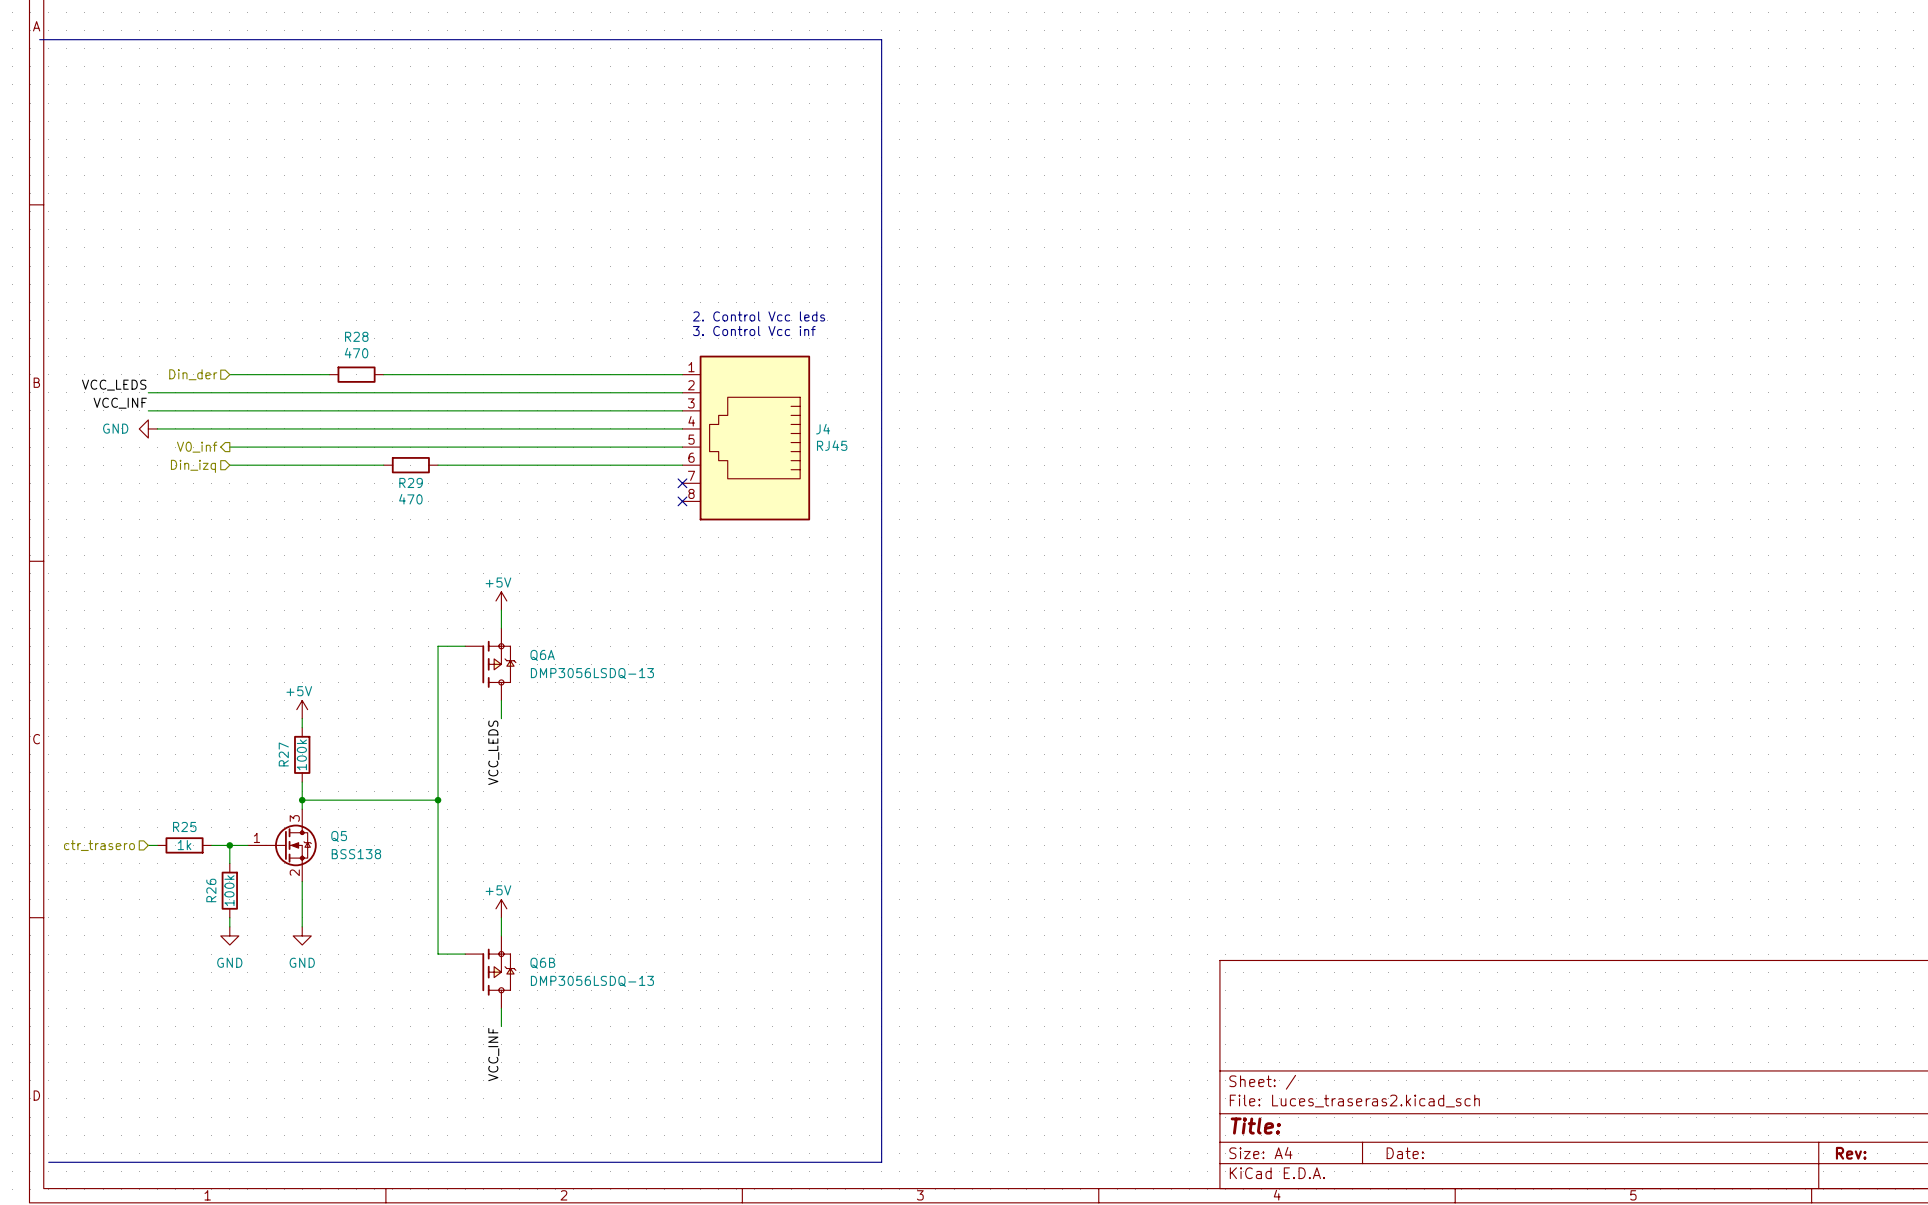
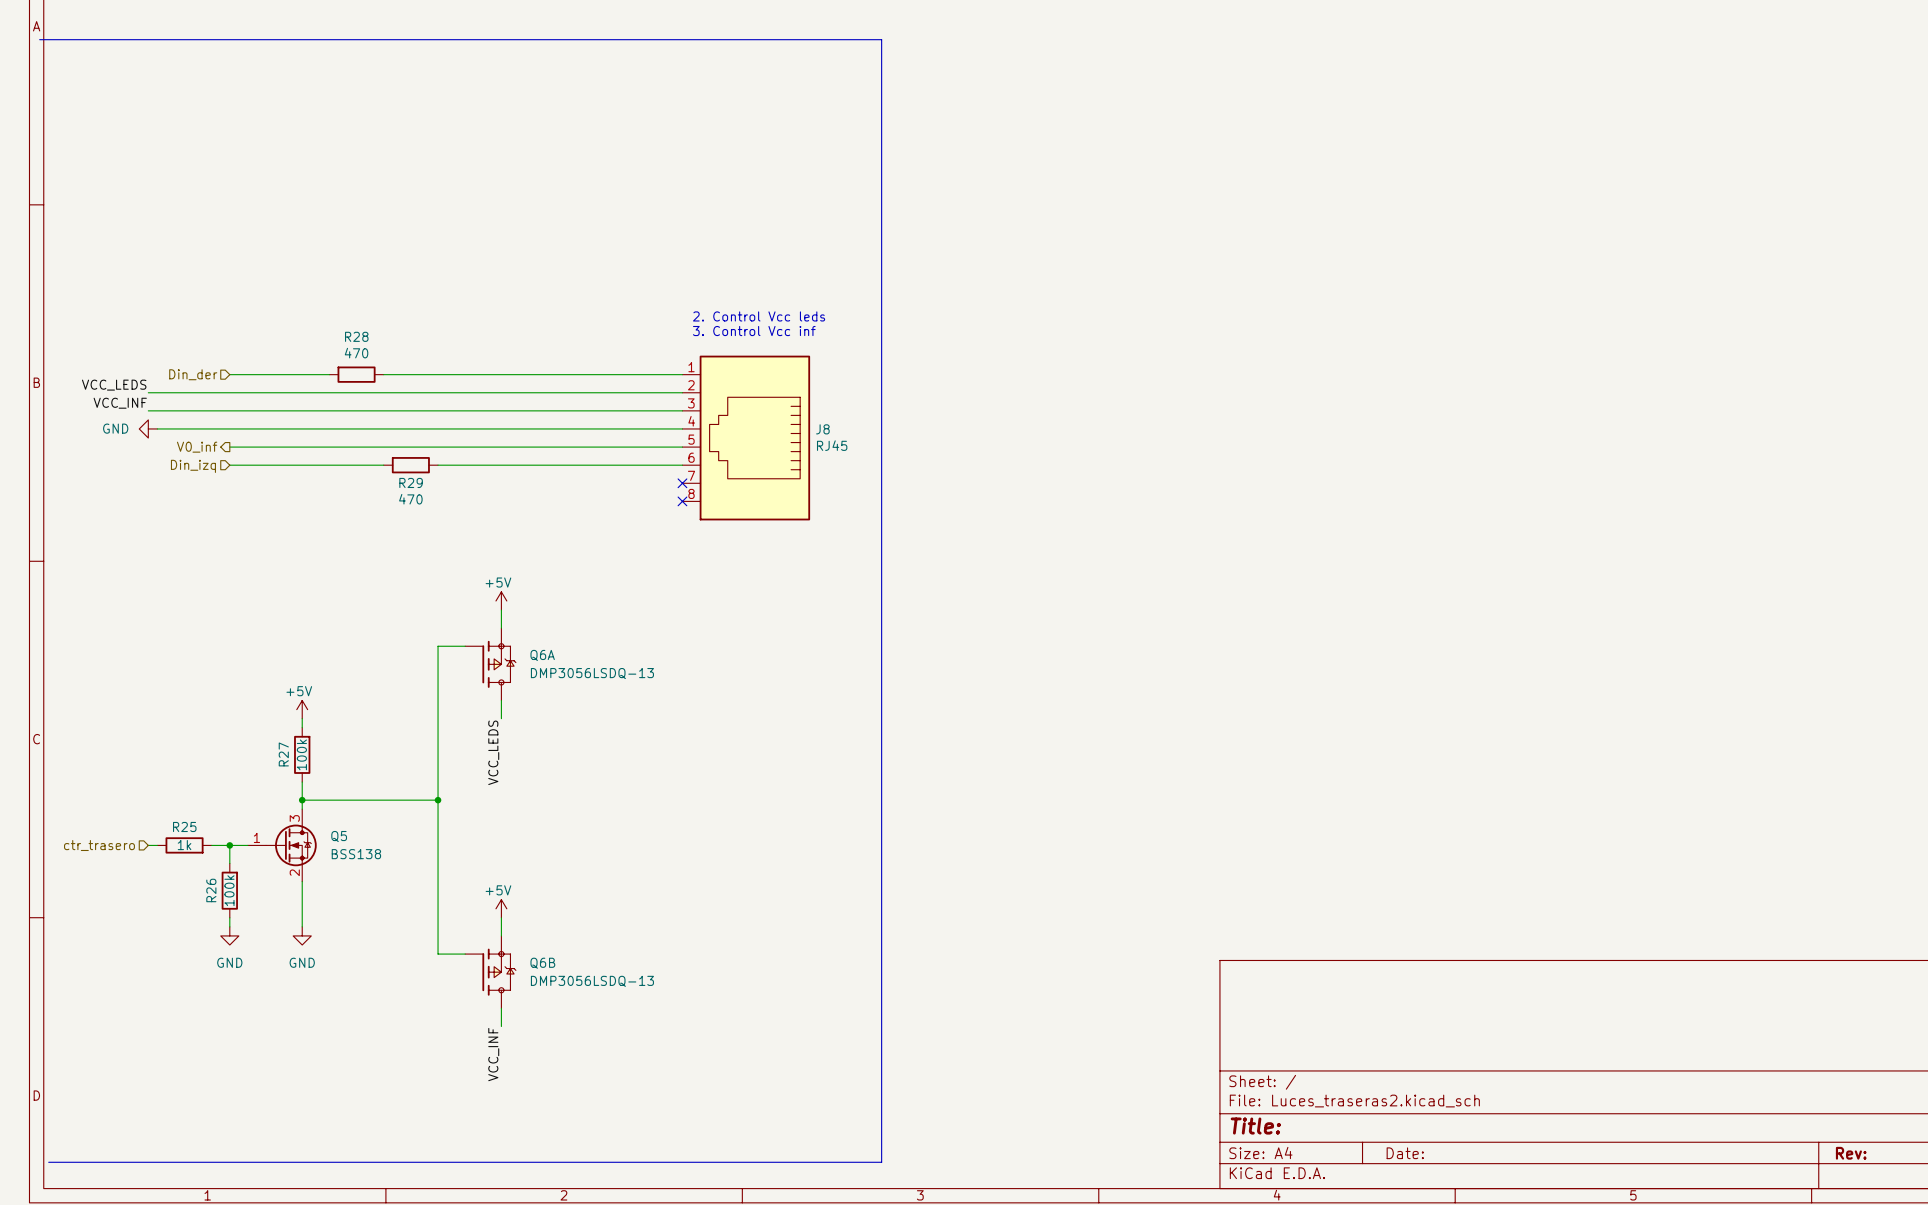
J4 name: J4 (823, 429) -> J8 (822, 429)

